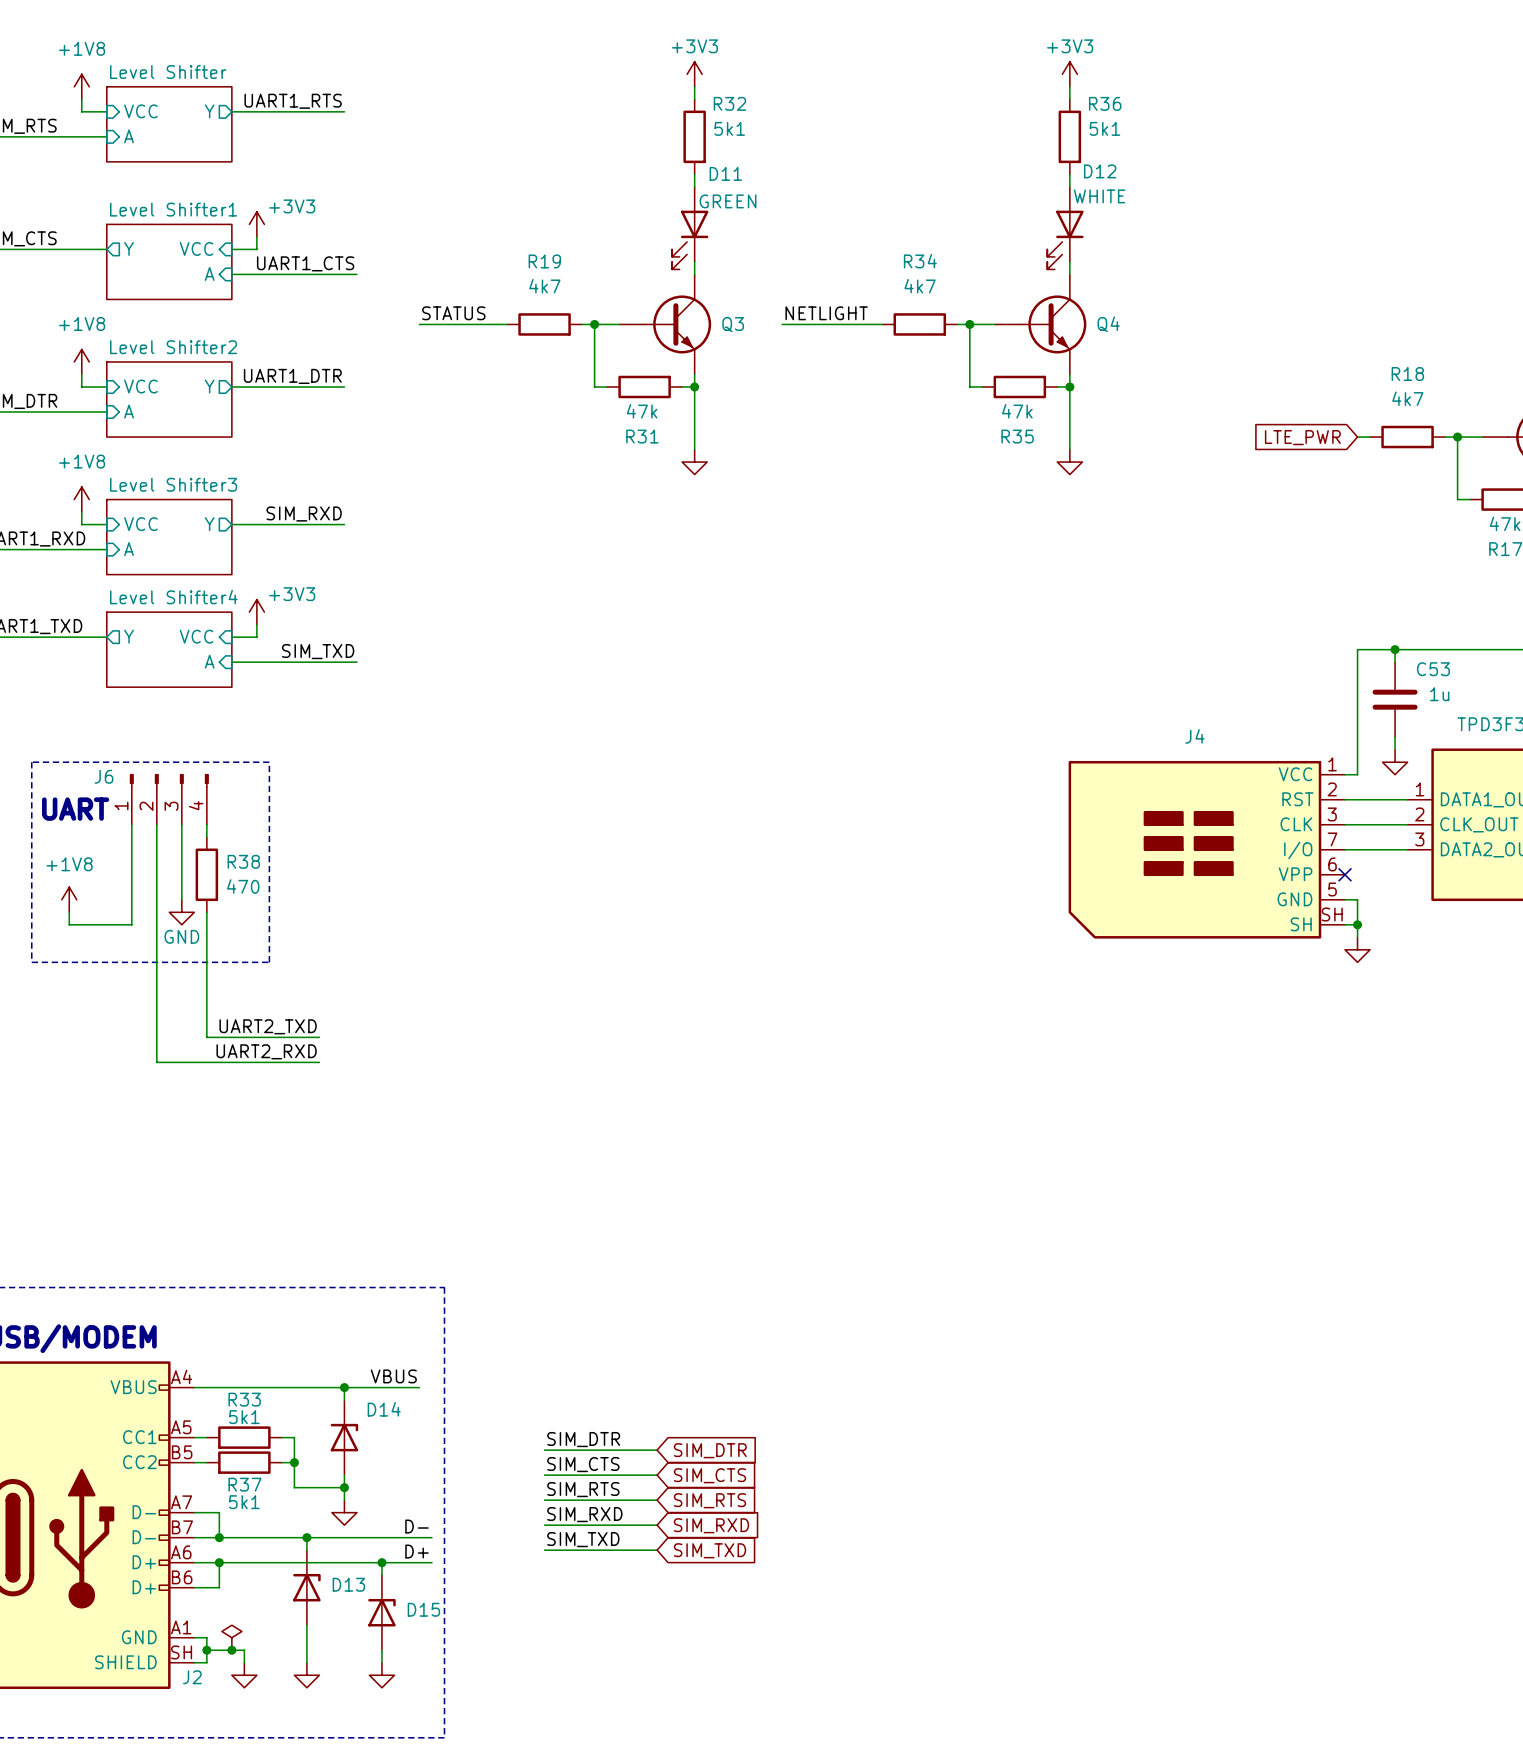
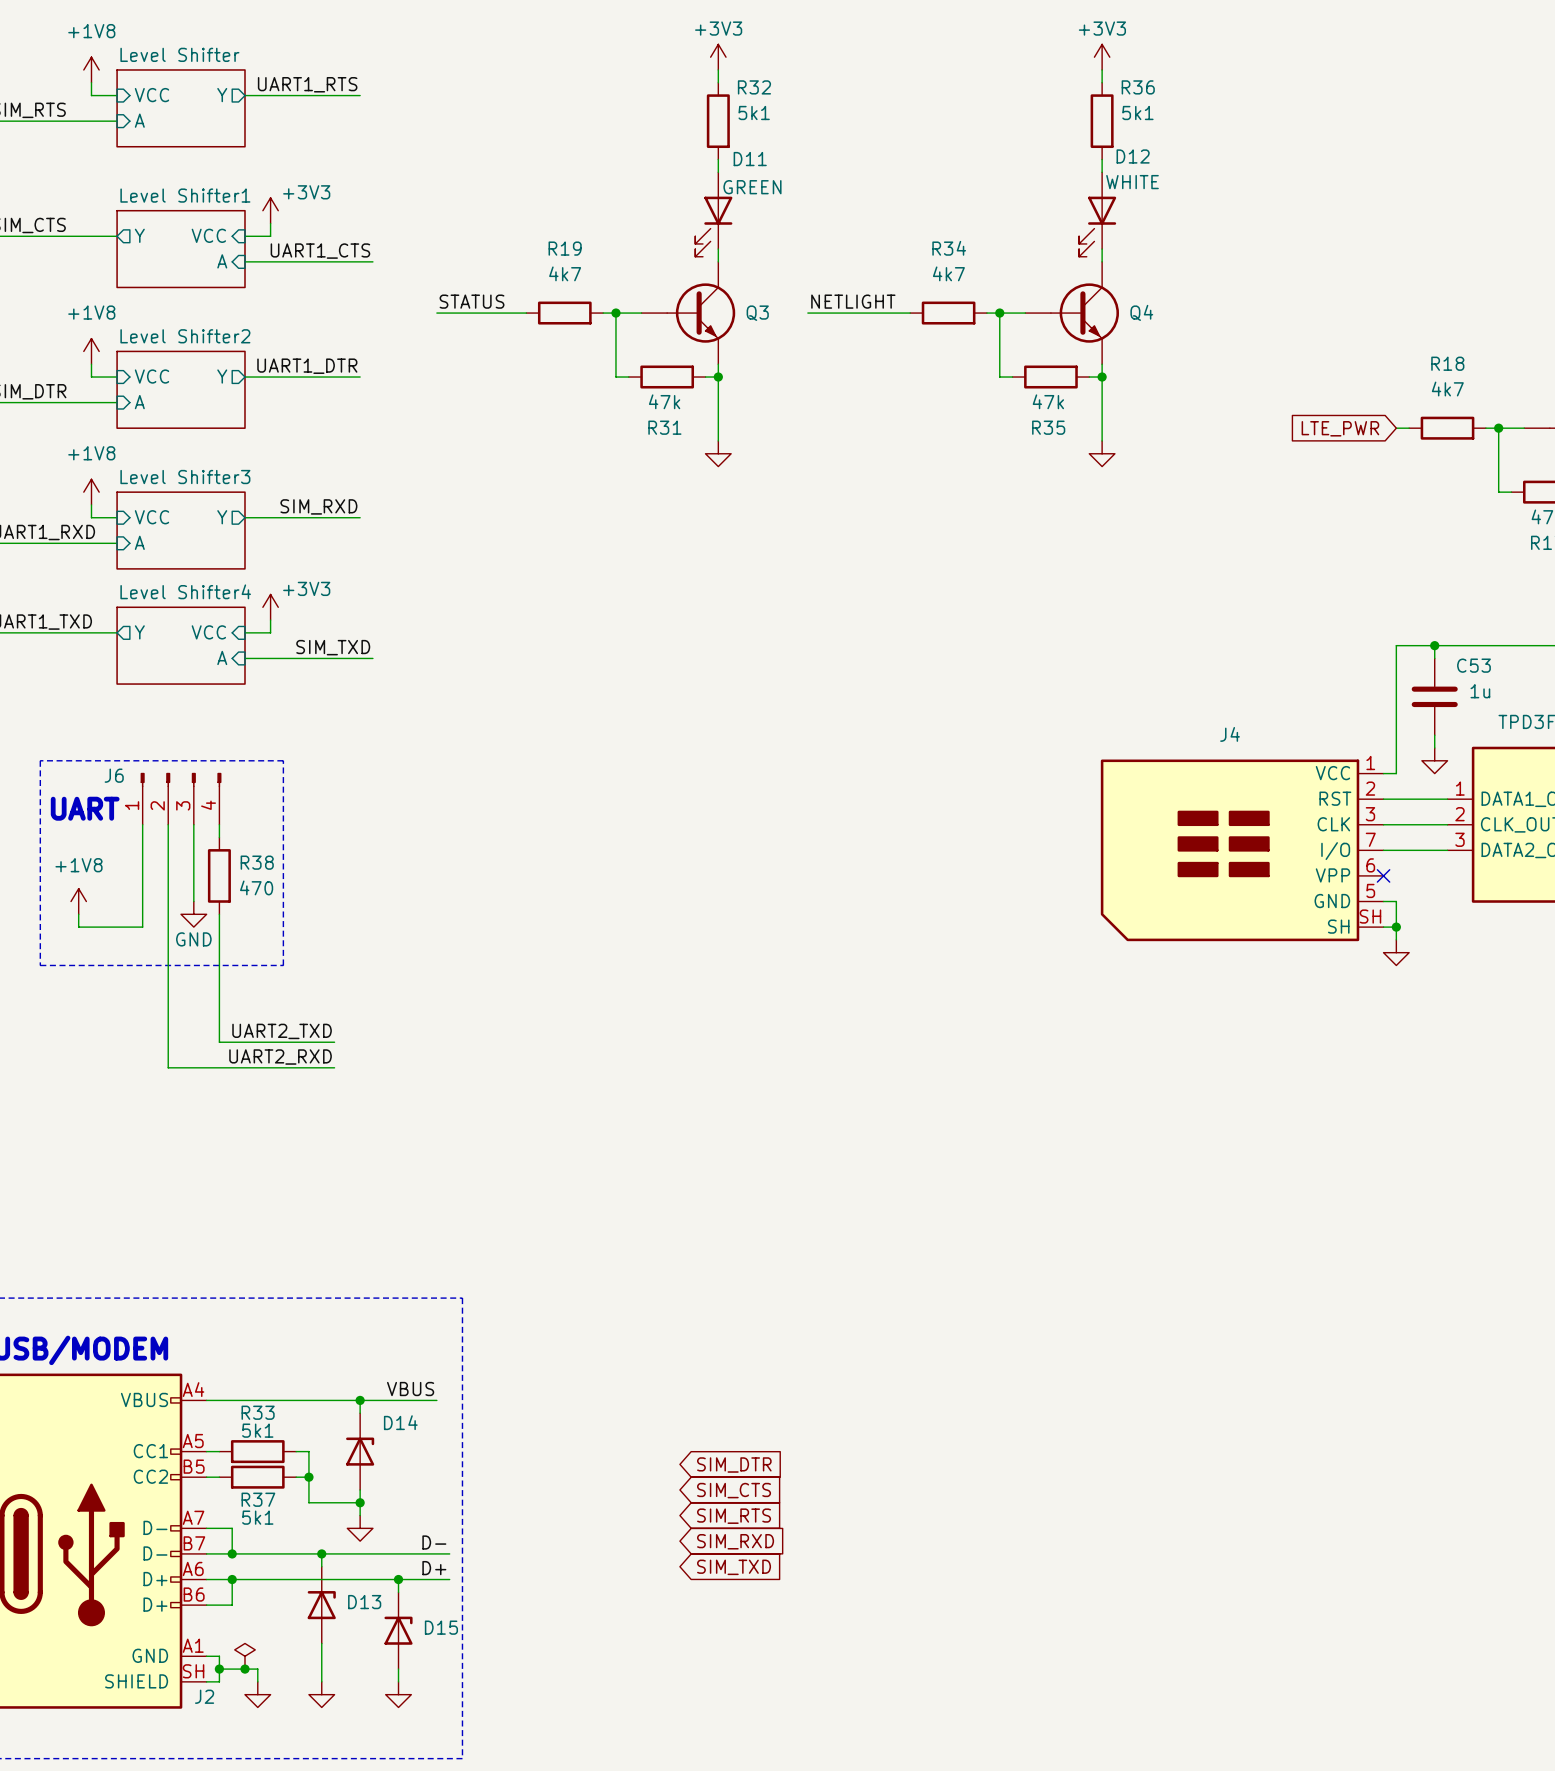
label: SIM_DTR (583, 1439) -> none
wire: (544, 1450) (657, 1450) -> none
label: SIM_CTS (583, 1464) -> none
wire: (544, 1475) (657, 1475) -> none
label: SIM_RTS (583, 1489) -> none
wire: (544, 1500) (657, 1500) -> none
label: SIM_RXD (584, 1514) -> none
wire: (544, 1525) (657, 1525) -> none
label: SIM_TXD (583, 1539) -> none
wire: (544, 1550) (657, 1550) -> none

